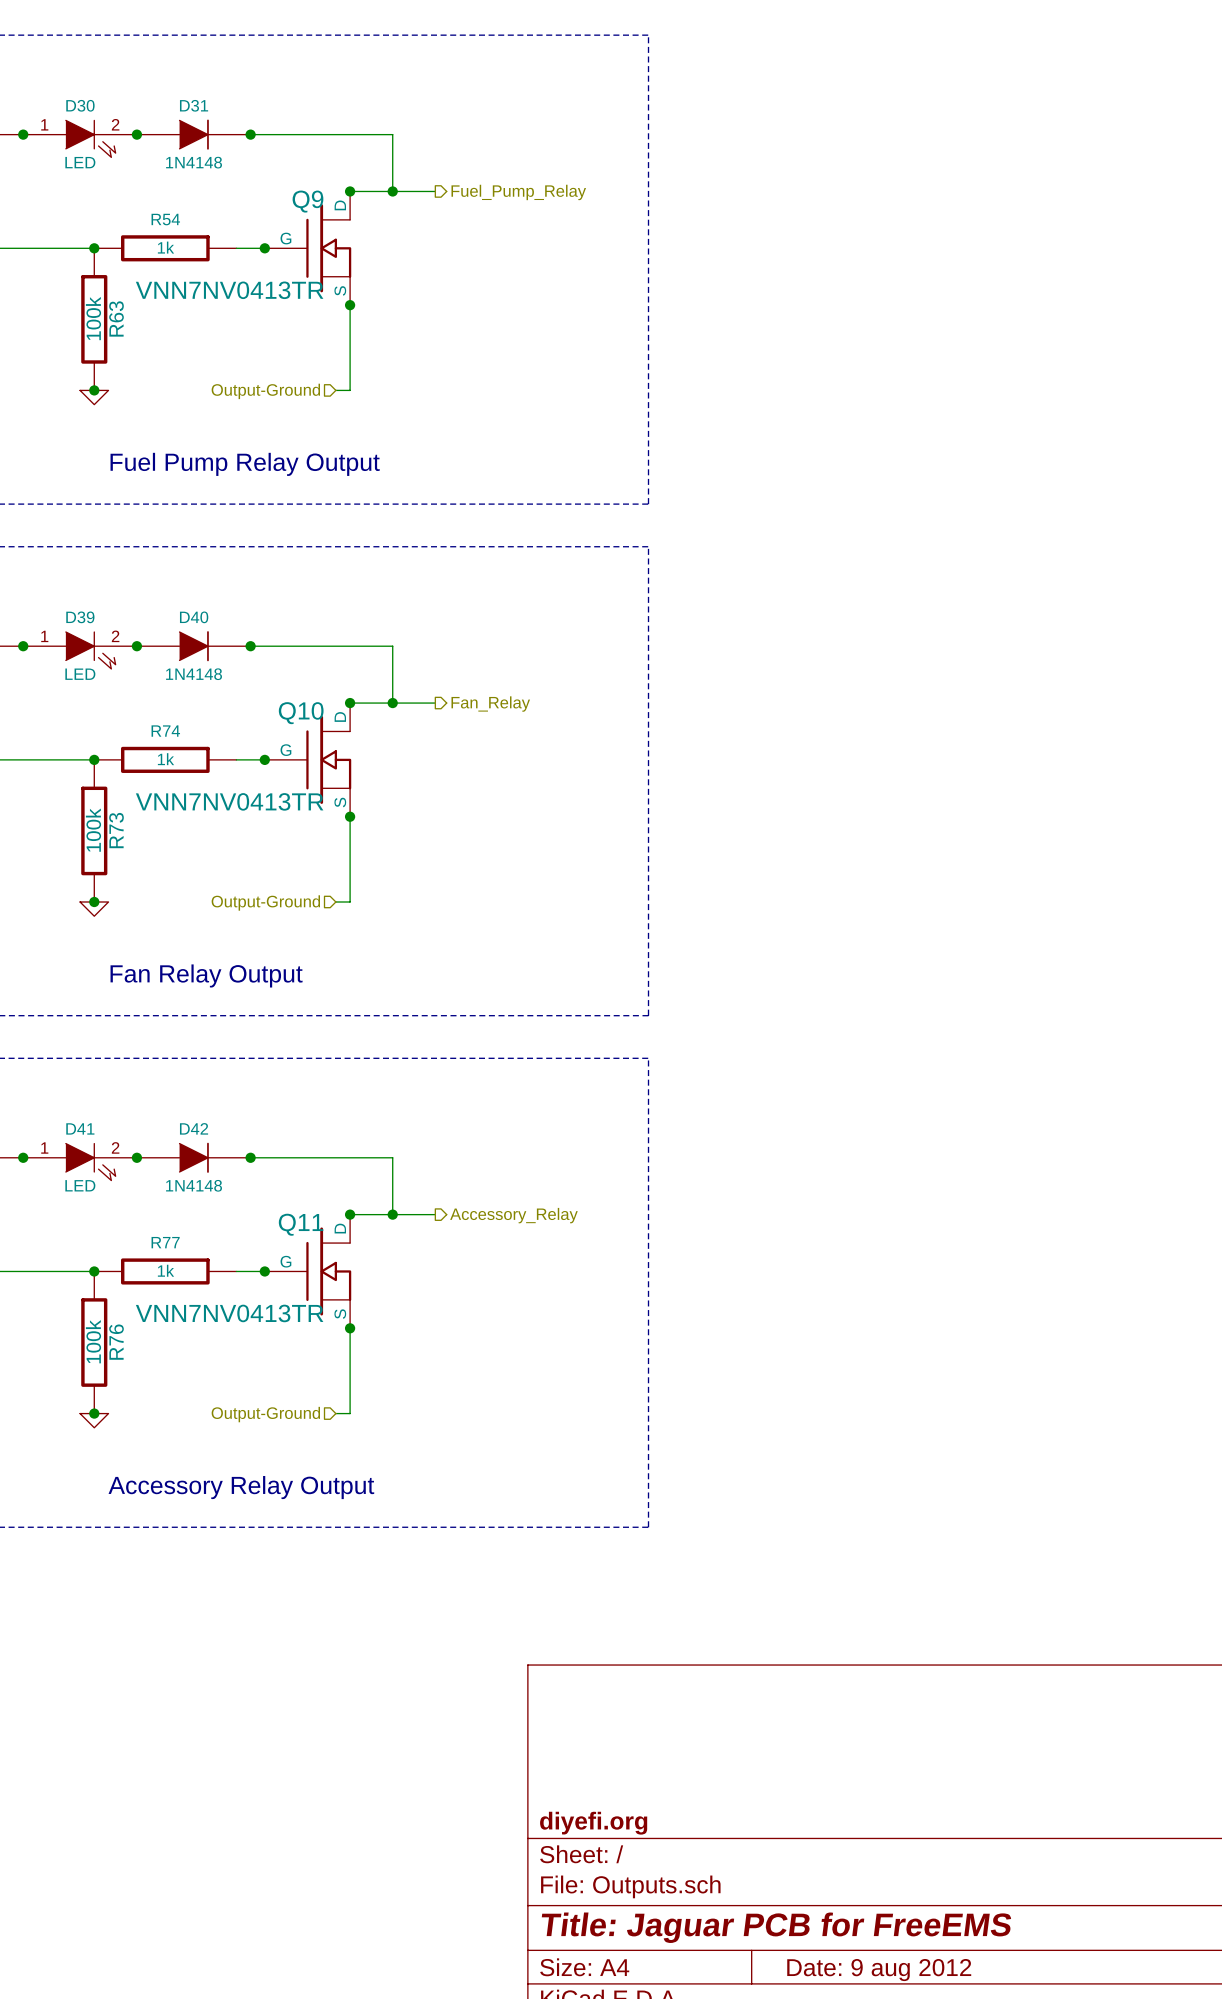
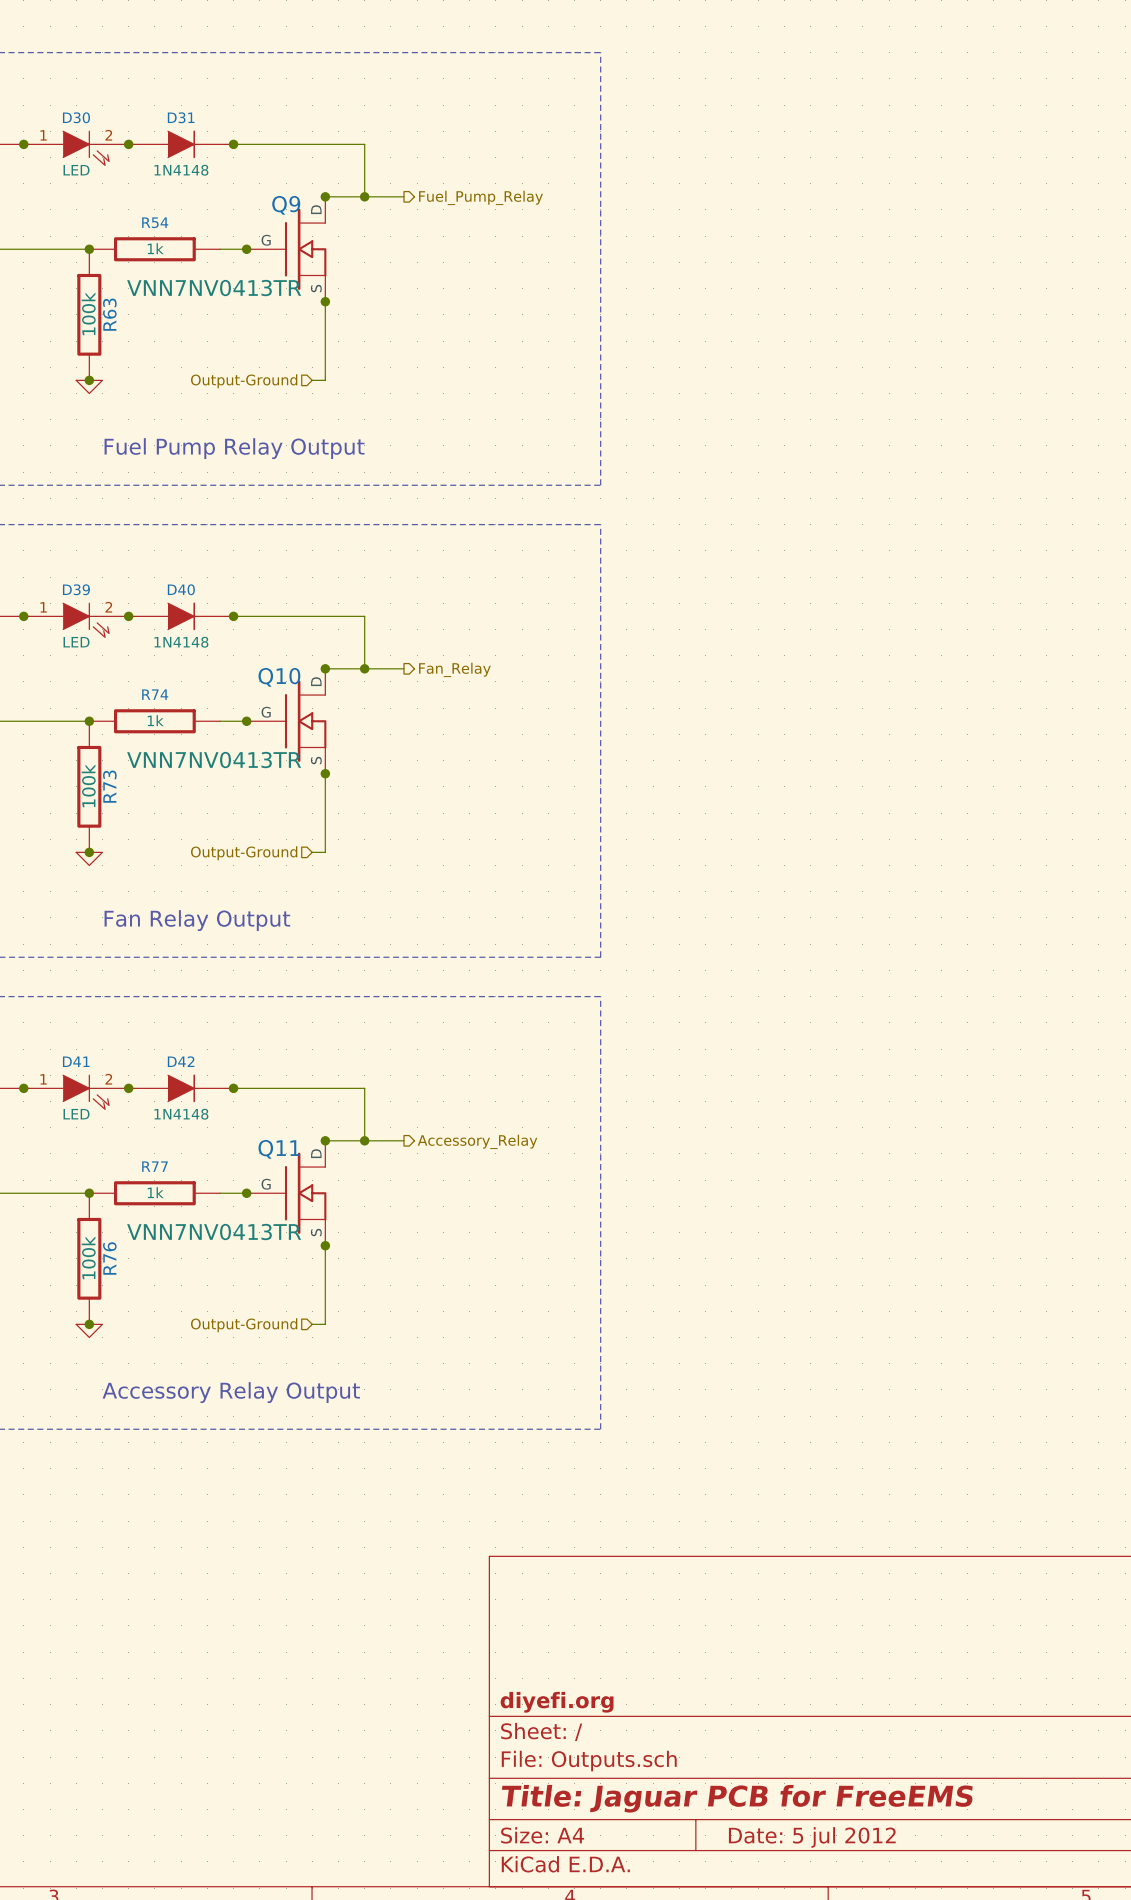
title block: Date: 9 aug 2012 (879, 1970) -> Date: 5 jul 2012 (812, 1837)

